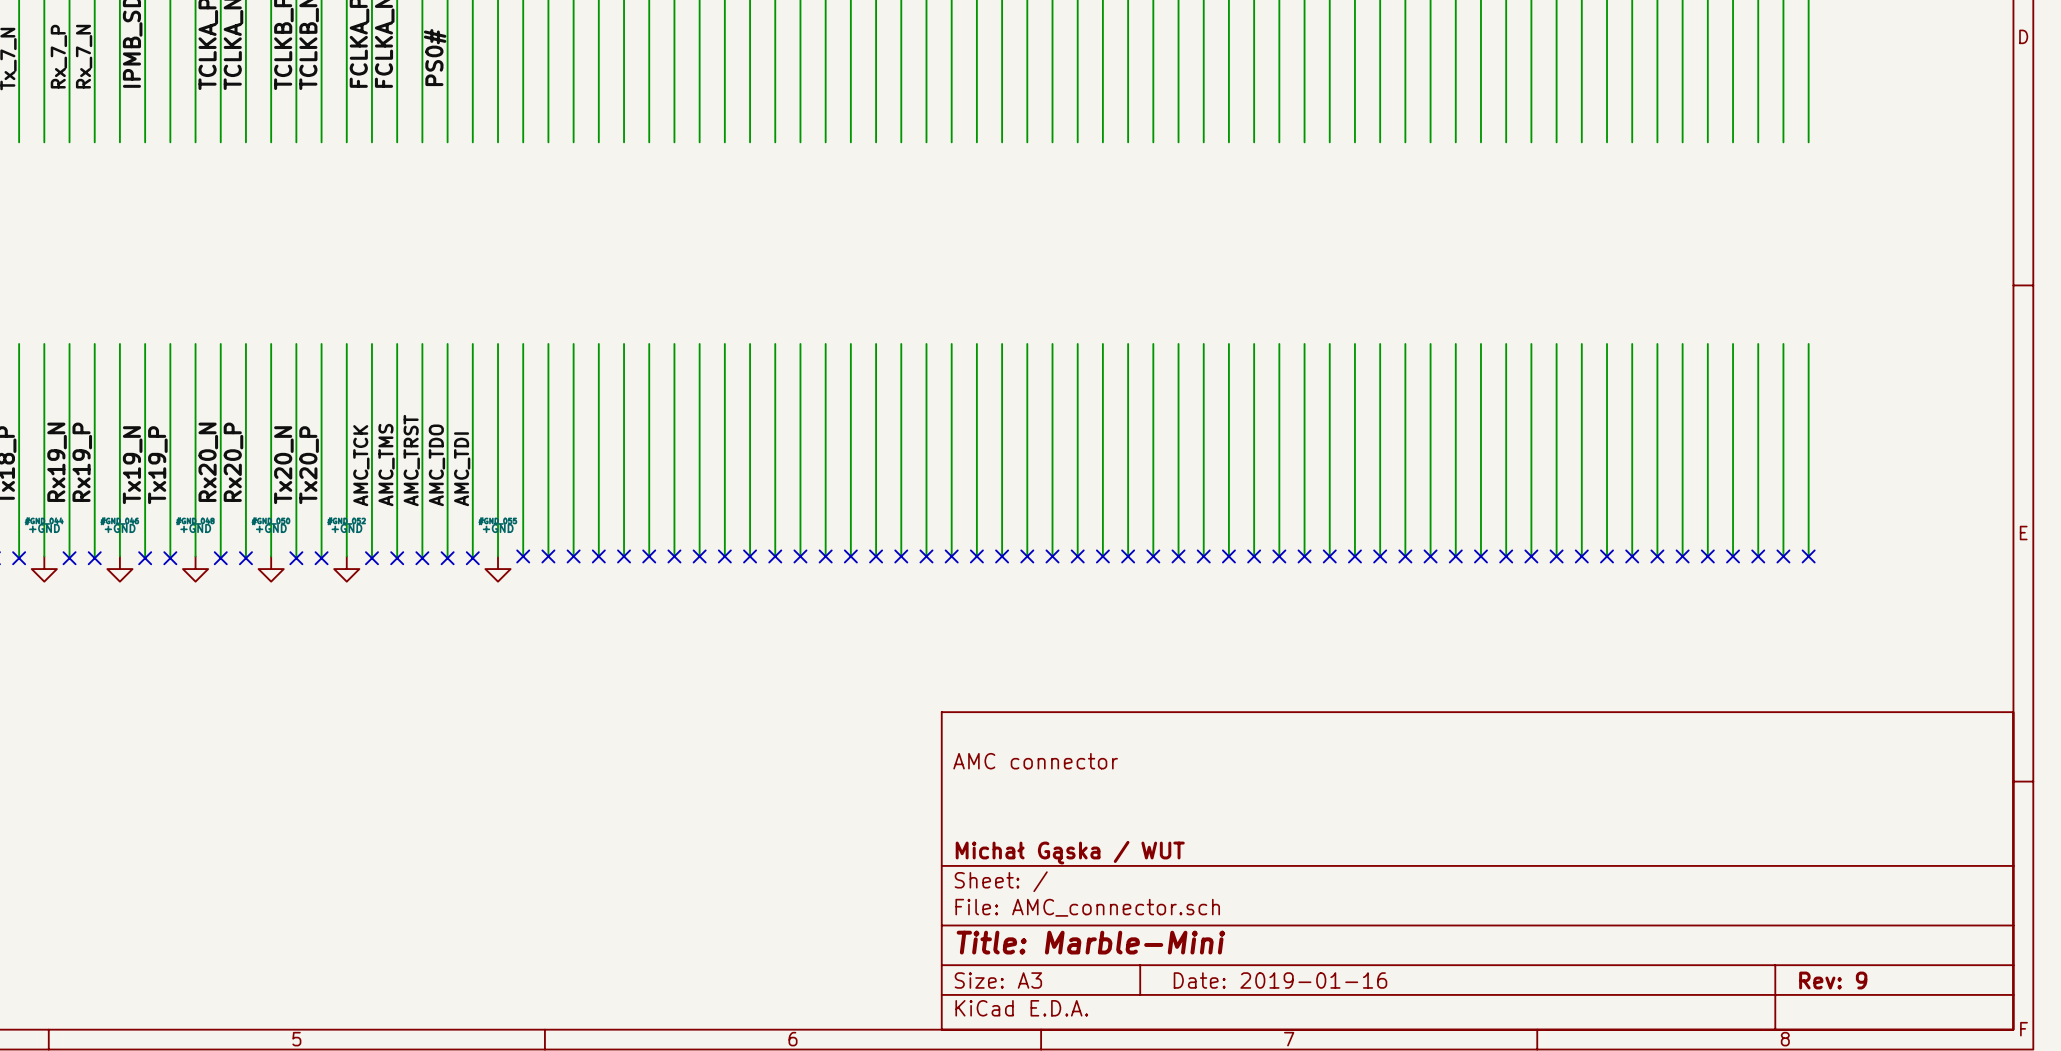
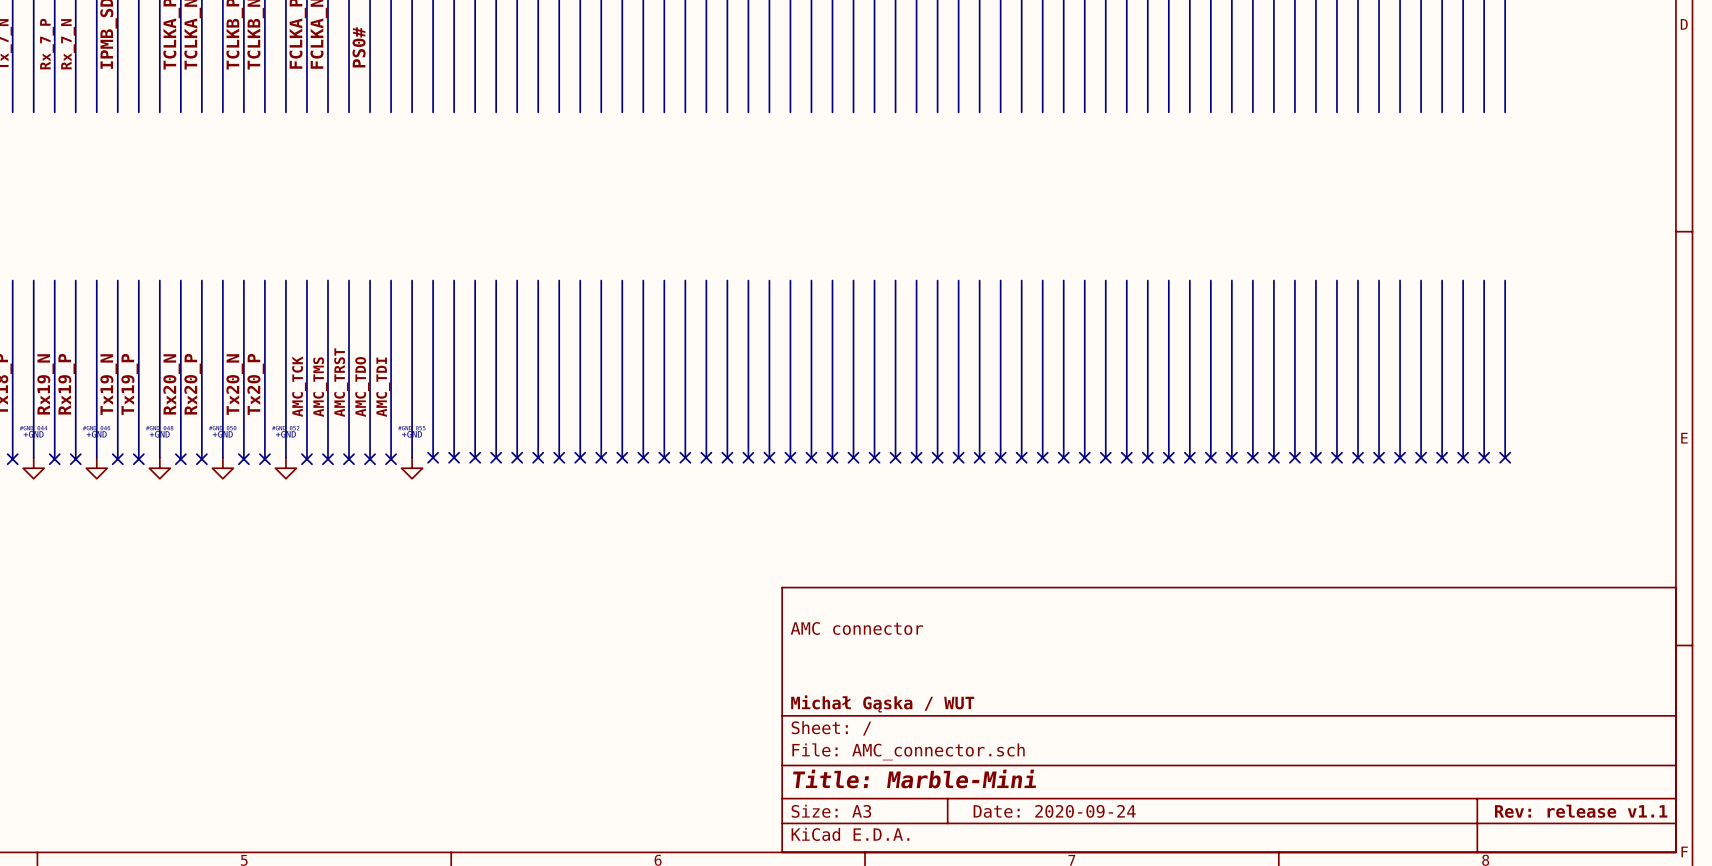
title block: Date: 2019-01-16 (1280, 980) -> Date: 2020-09-24 (1054, 811)
title block: Rev: 9 (1833, 980) -> Rev: release v1.1 (1581, 811)

